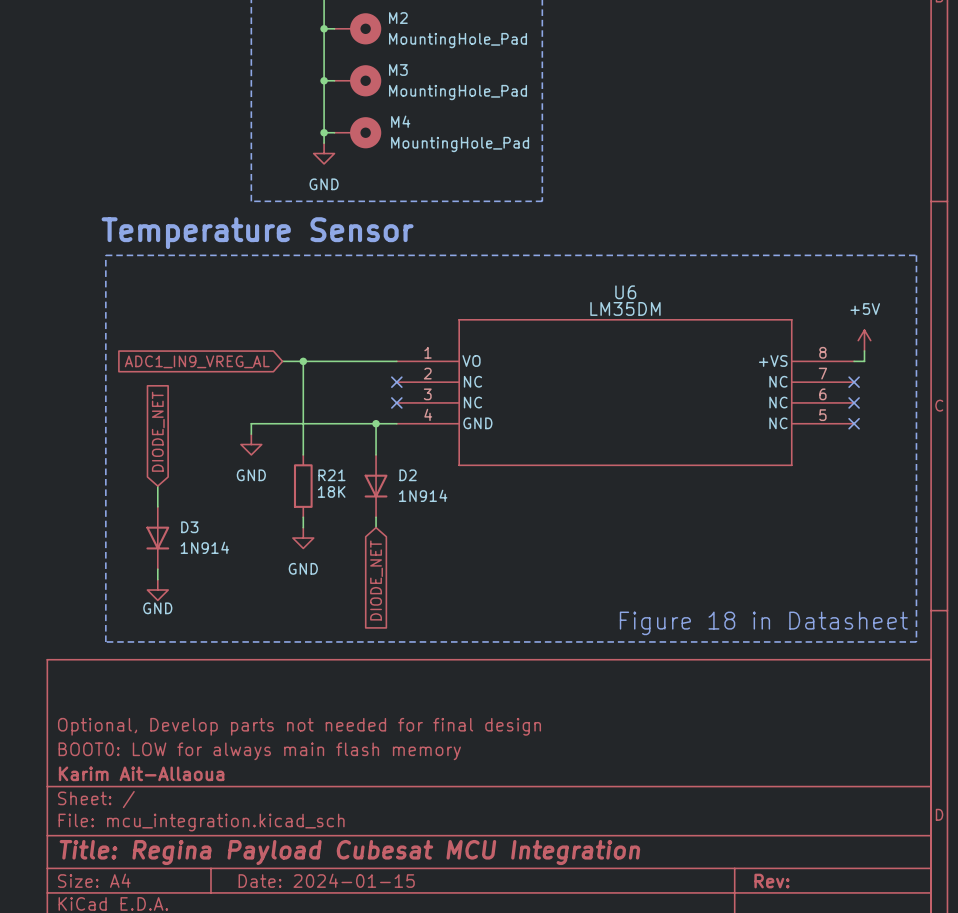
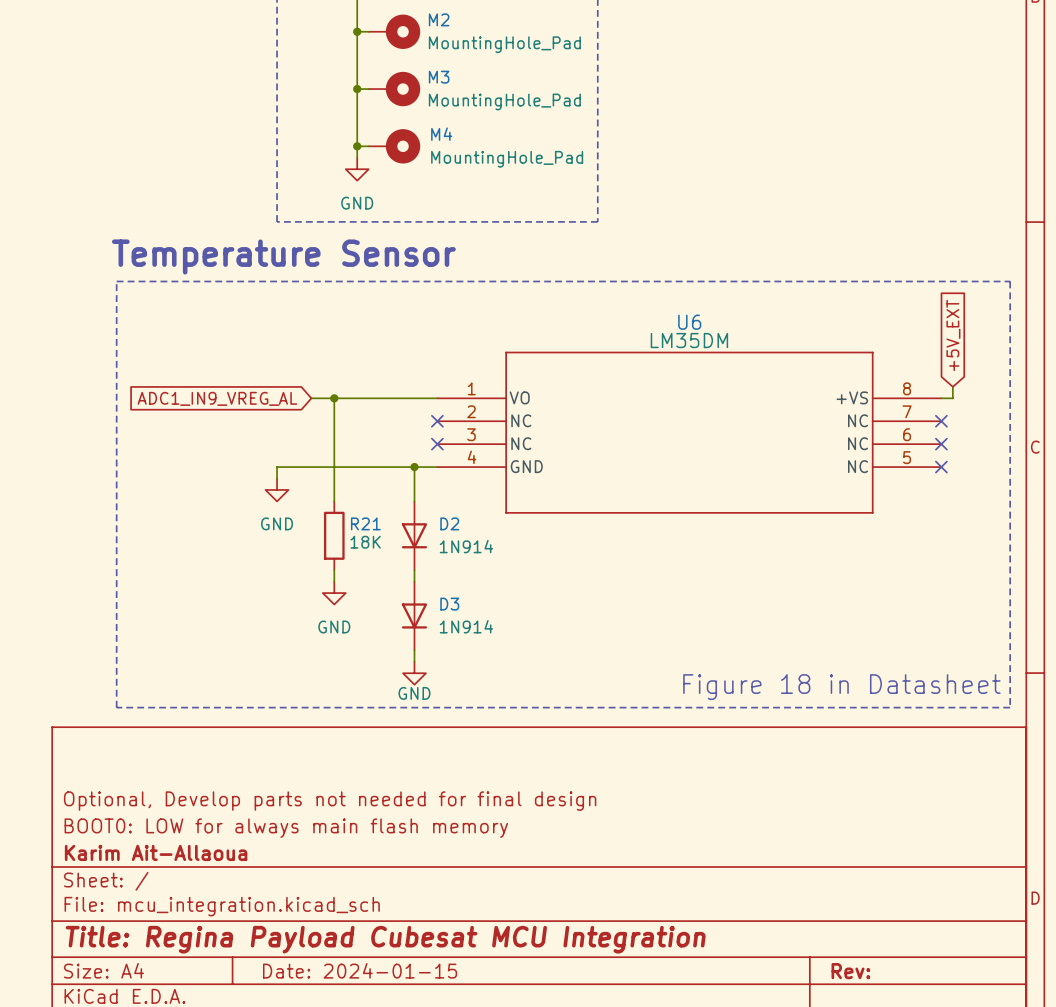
global label: none -> +5V_EXT (953, 335)
power symbol: +5V (864, 340) -> none
global label: DIODE_NET (158, 431) -> none
wire: (157, 486) (157, 506) -> none
D3 position: (157, 538) -> (414, 615)
wire: (157, 569) (157, 579) -> none
global label: DIODE_NET (376, 580) -> none
power symbol: GND (157, 590) -> none
wire: none -> (414, 650) (414, 661)
power symbol: none -> GND (414, 673)

